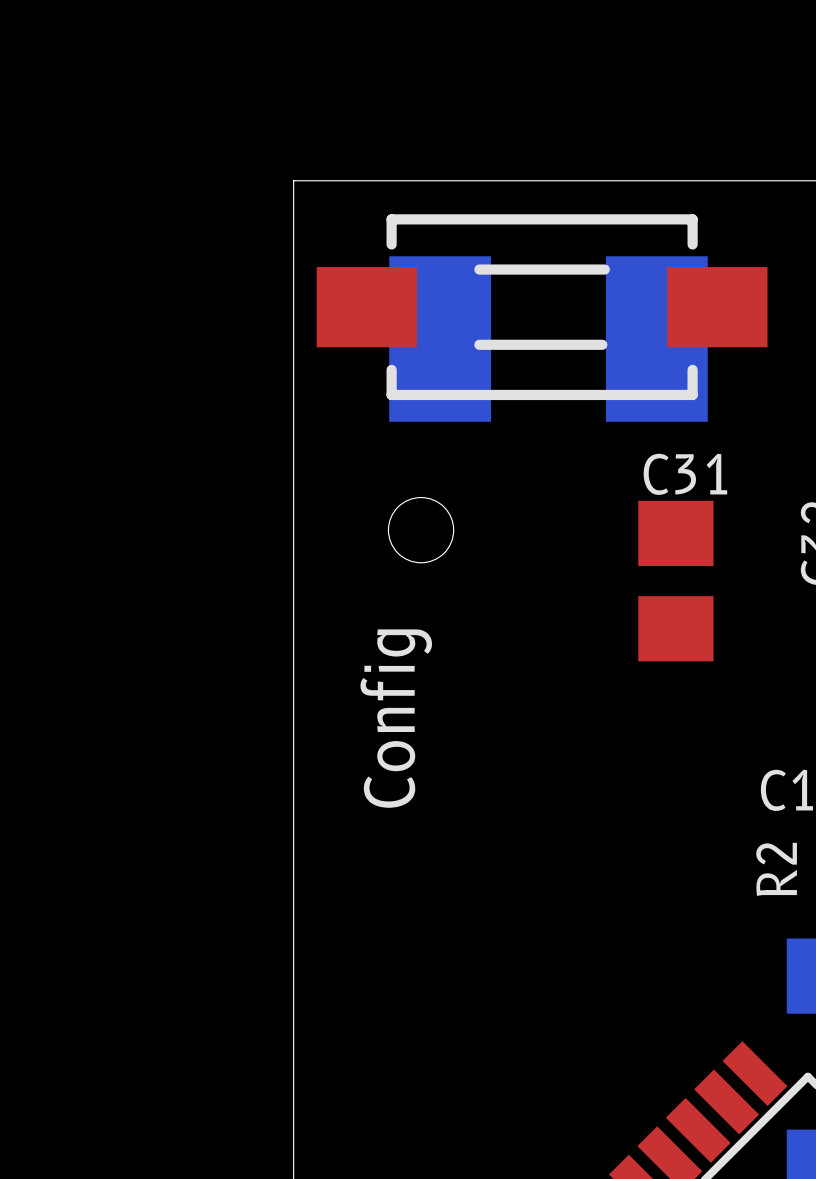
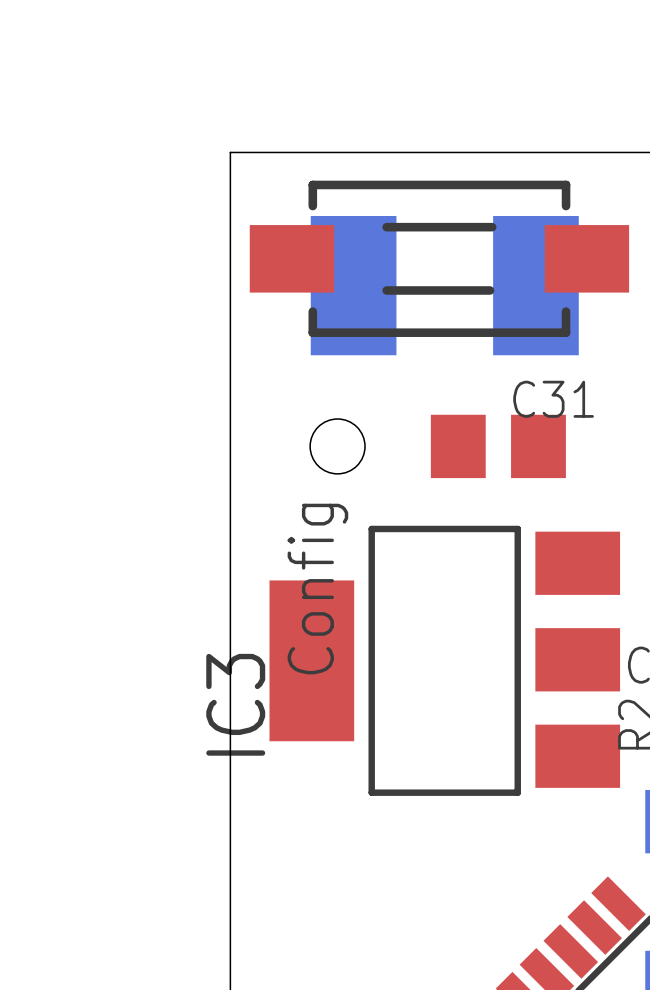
part rotation: 0° (675, 581) -> 90° clockwise (498, 446)
IC3: none -> (444, 660)

